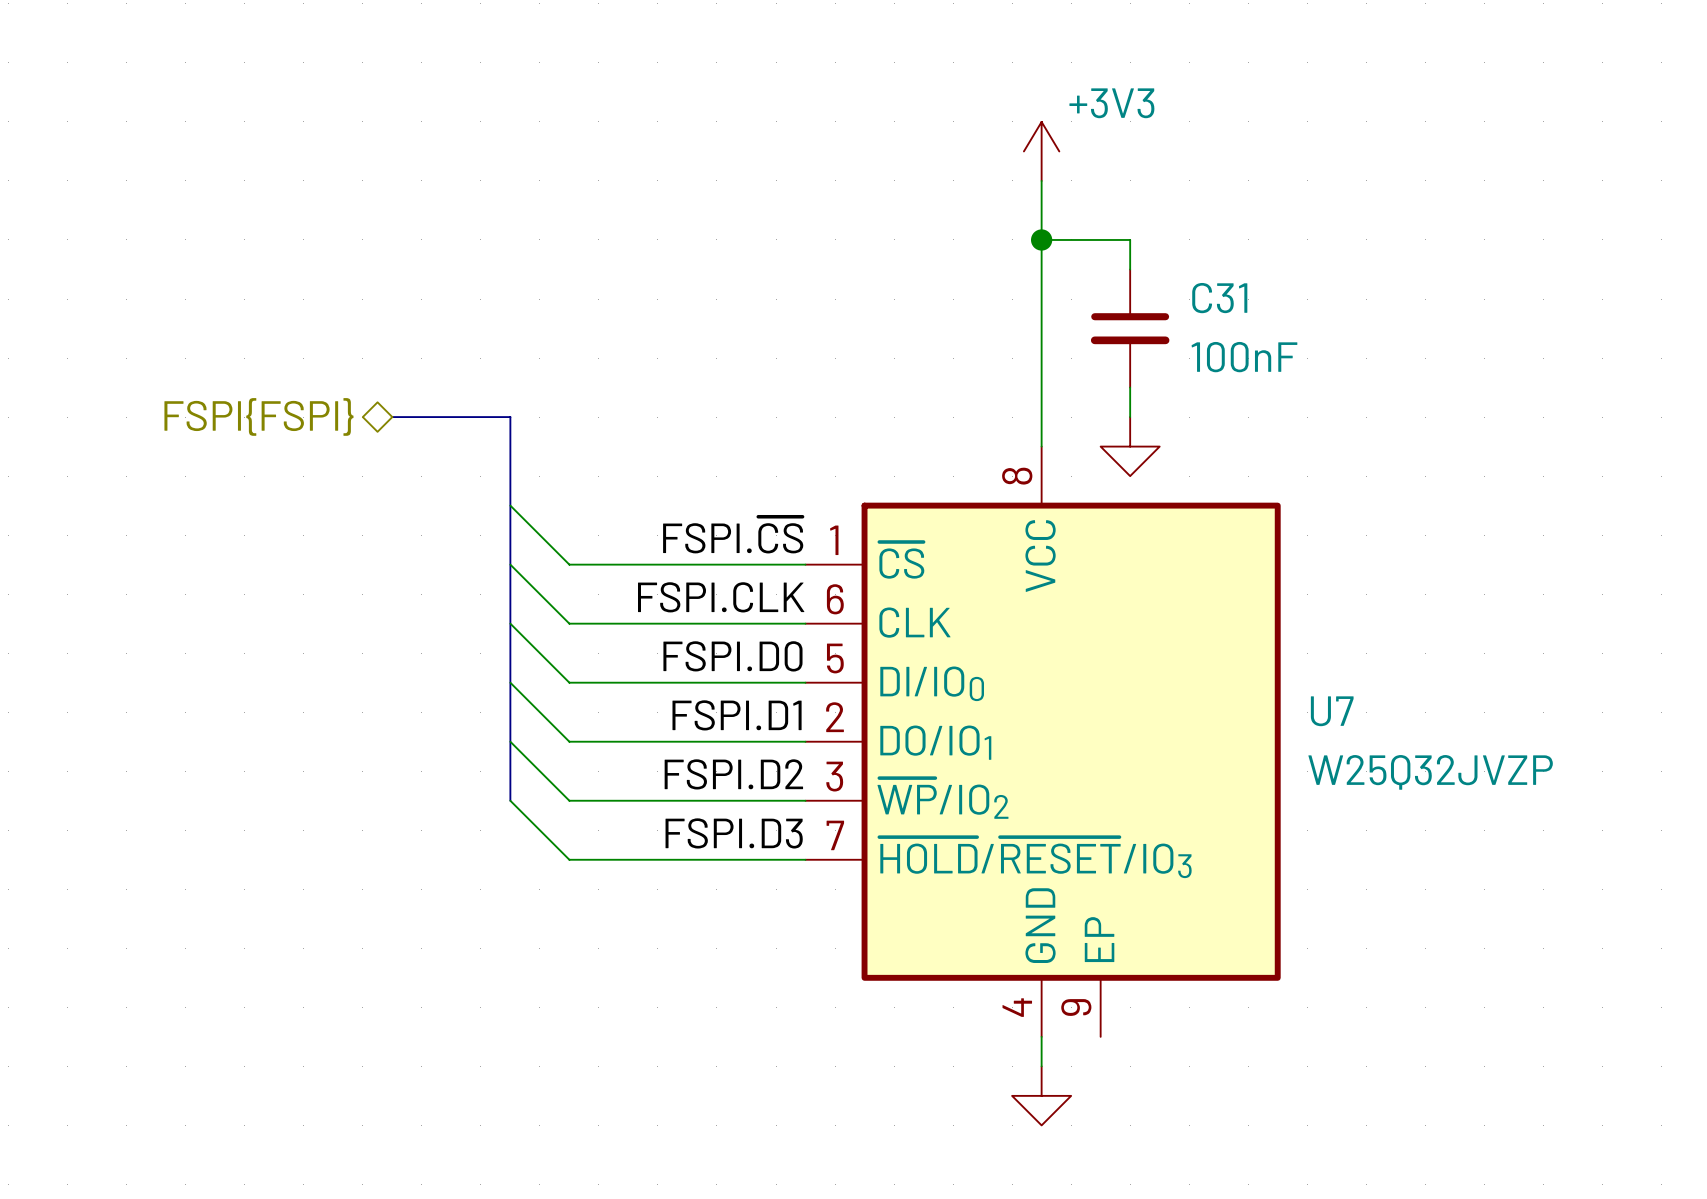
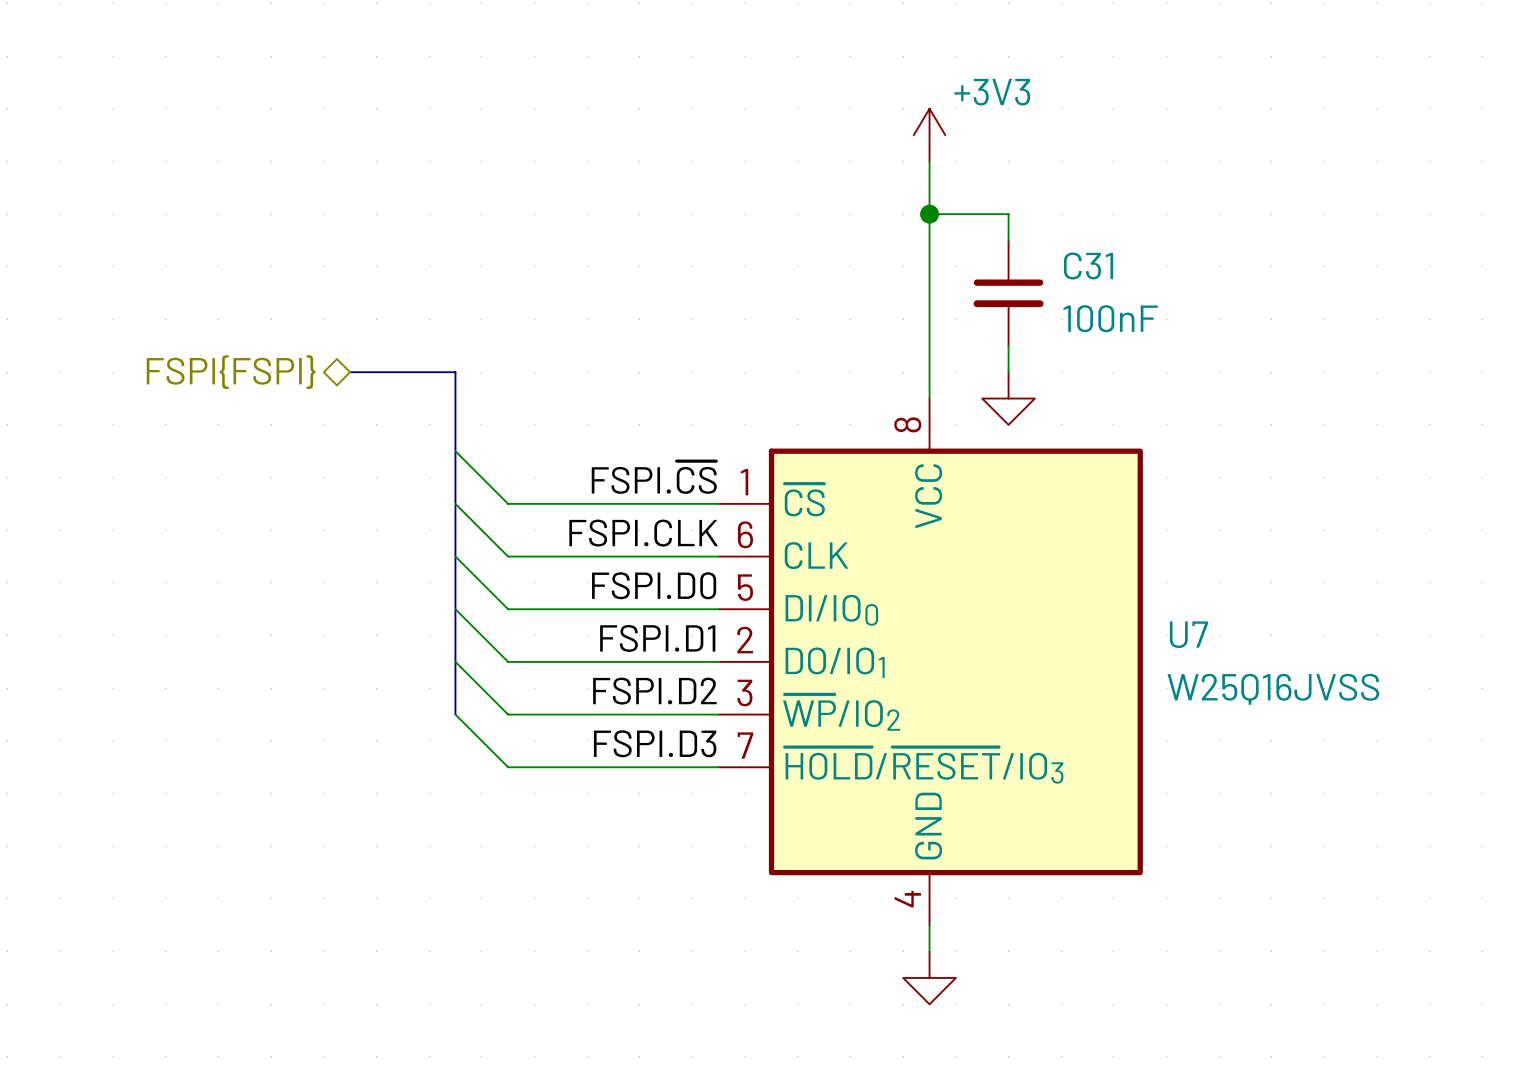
U7 symbol: [805, 446, 1281, 1037] -> [718, 398, 1143, 926]
U7 value: W25Q32JVZP (1430, 772) -> W25Q16JVSS (1273, 689)

